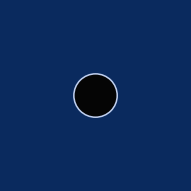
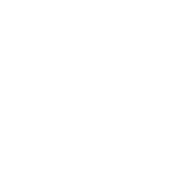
part: (95, 95) -> none

